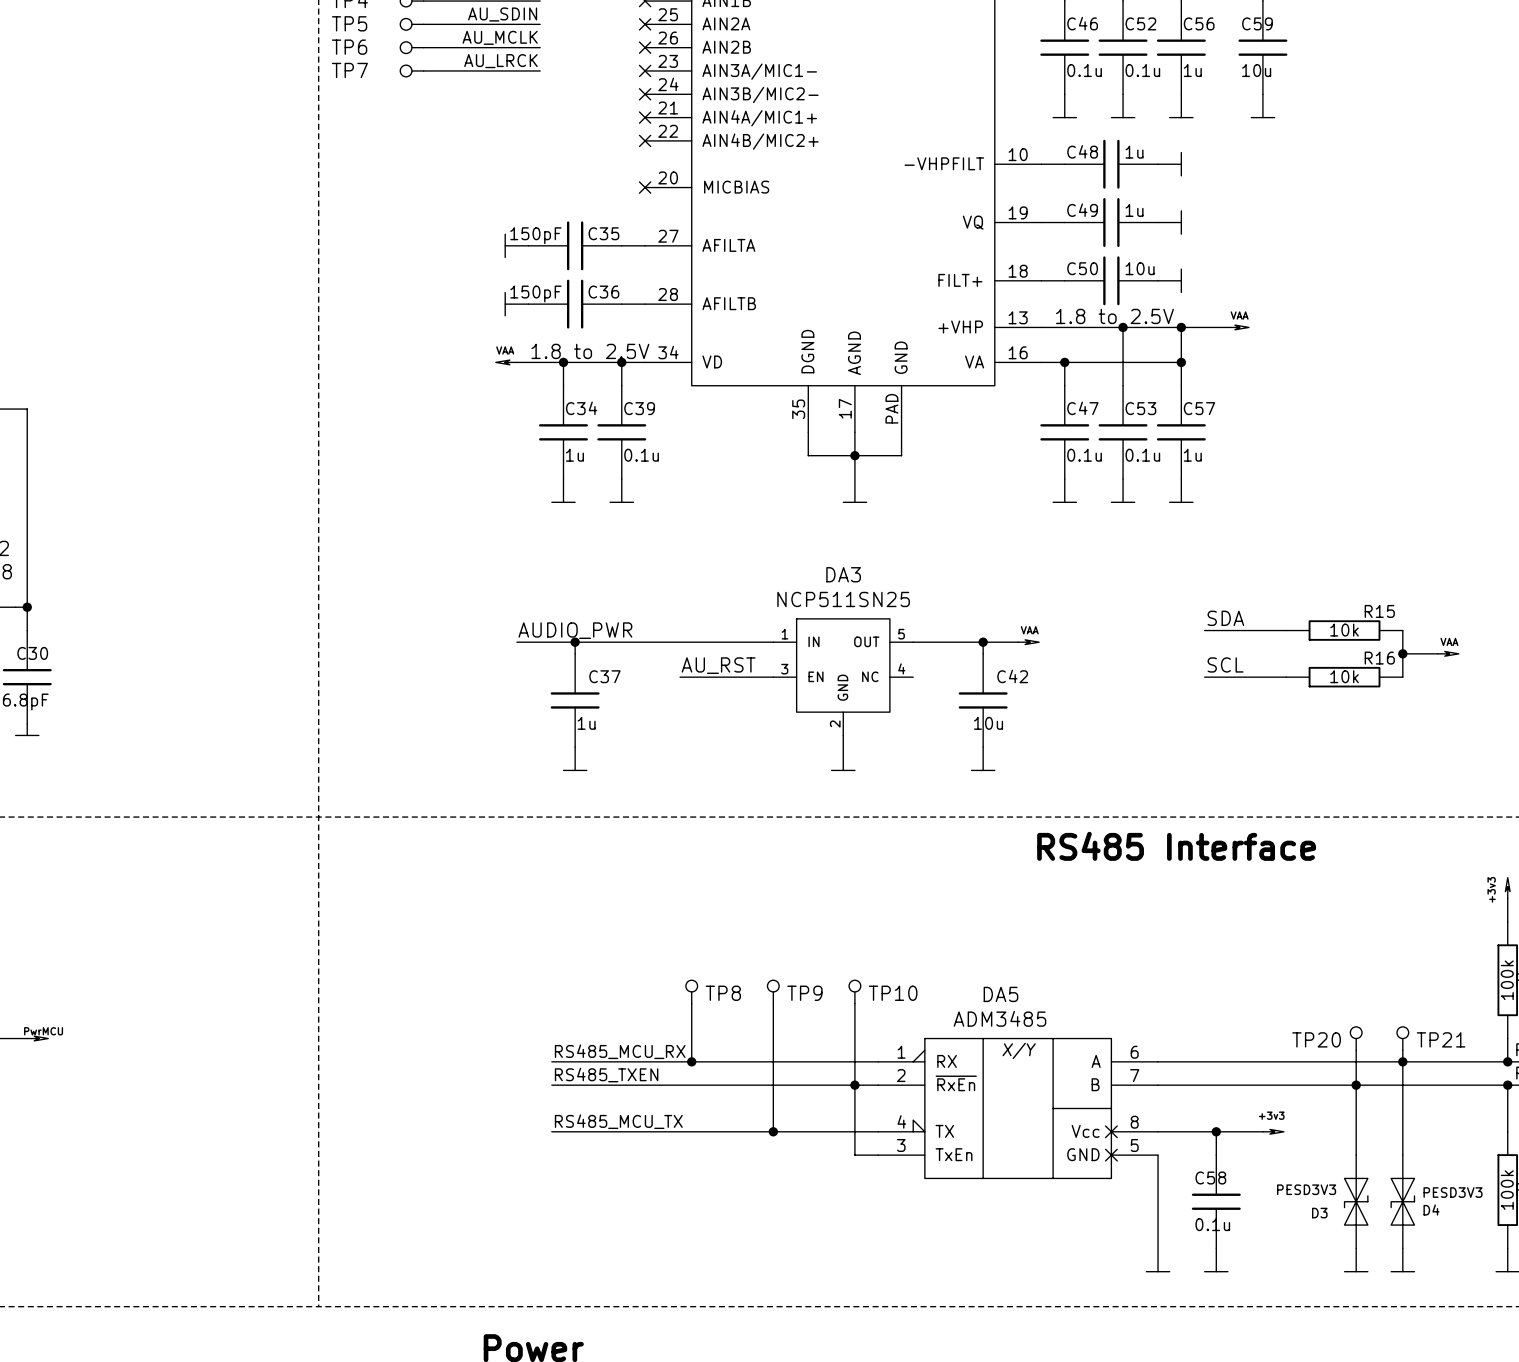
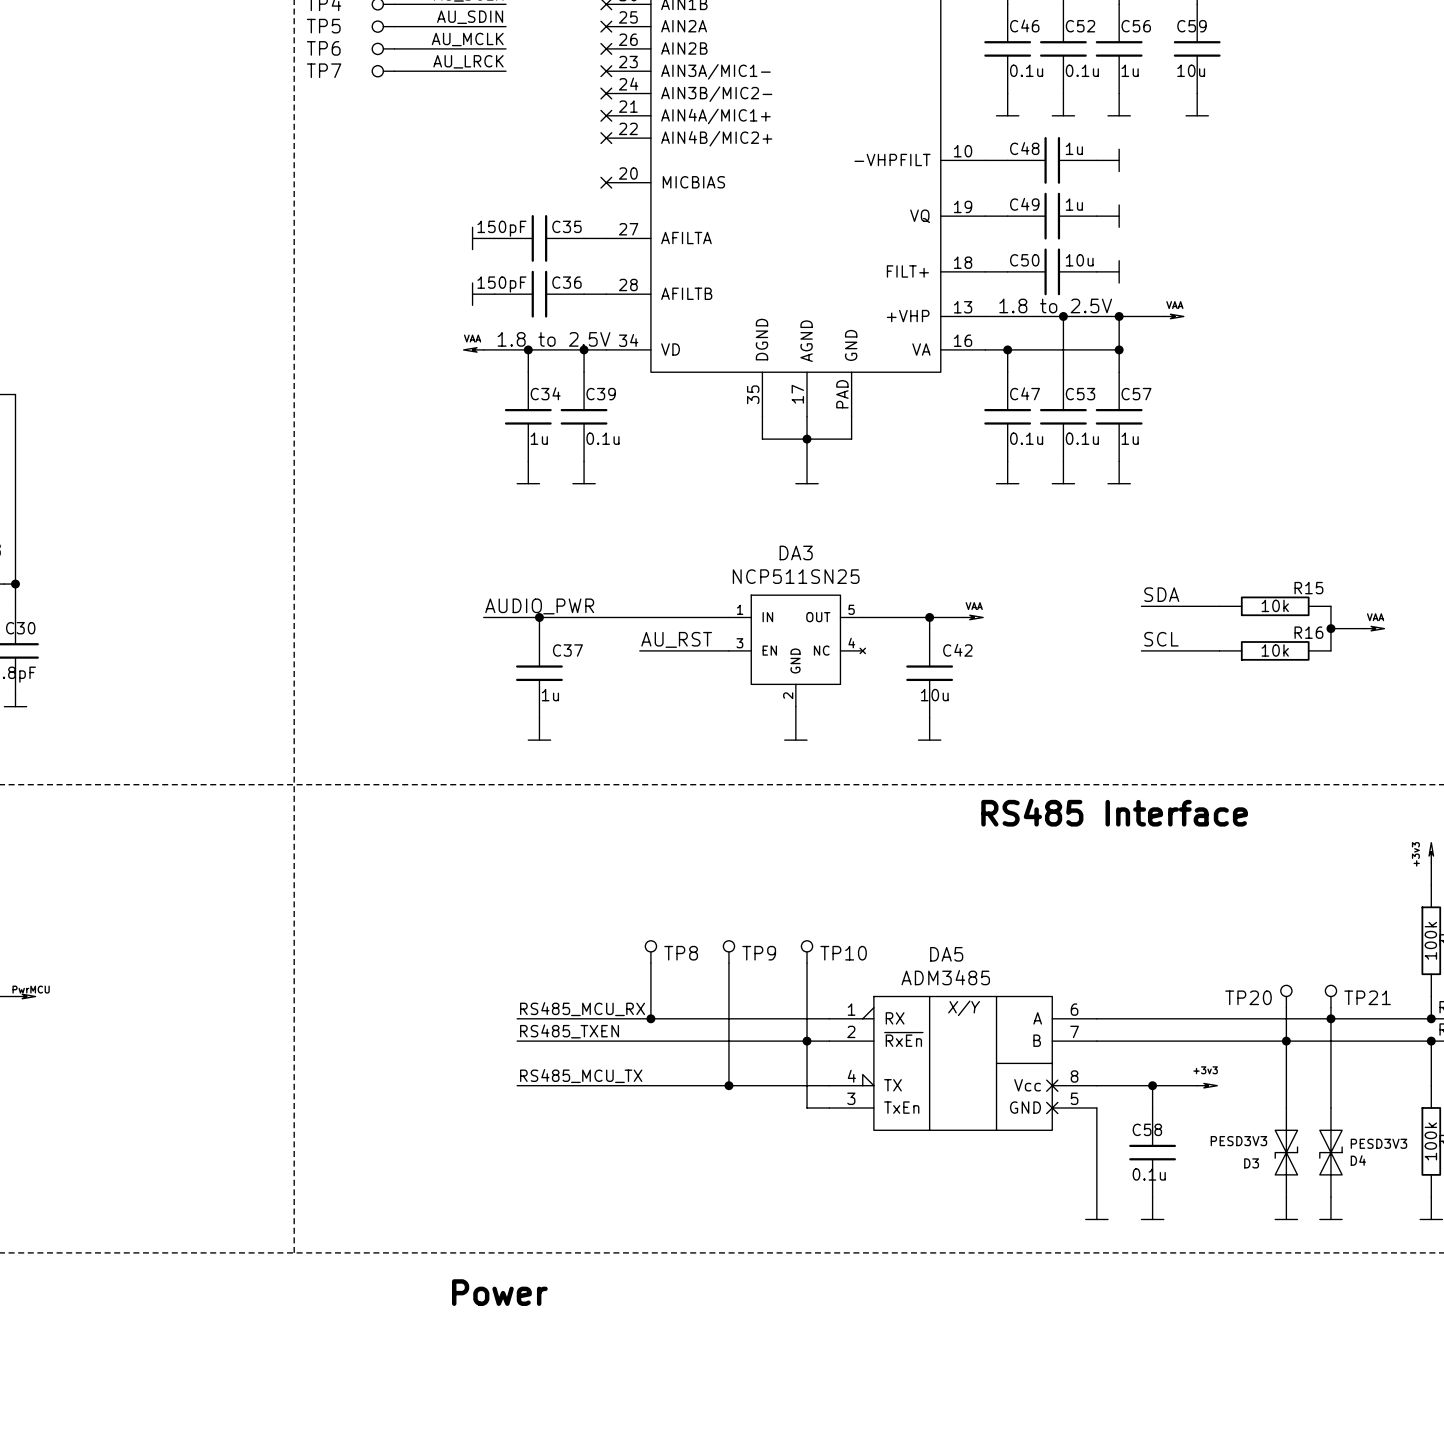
DA3 symbol: [773, 618, 914, 736] -> [728, 595, 866, 707]

